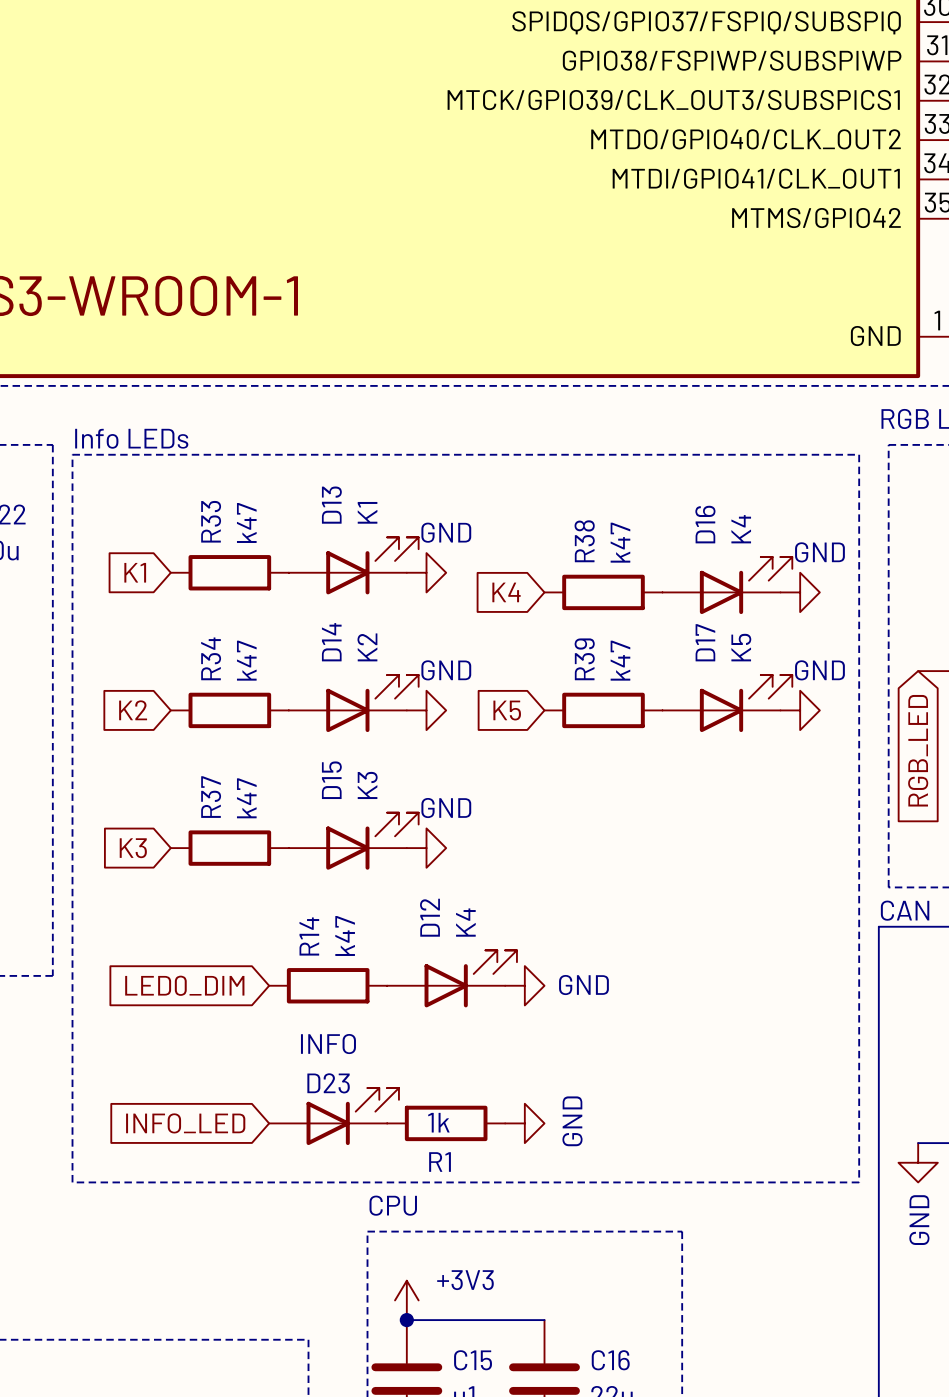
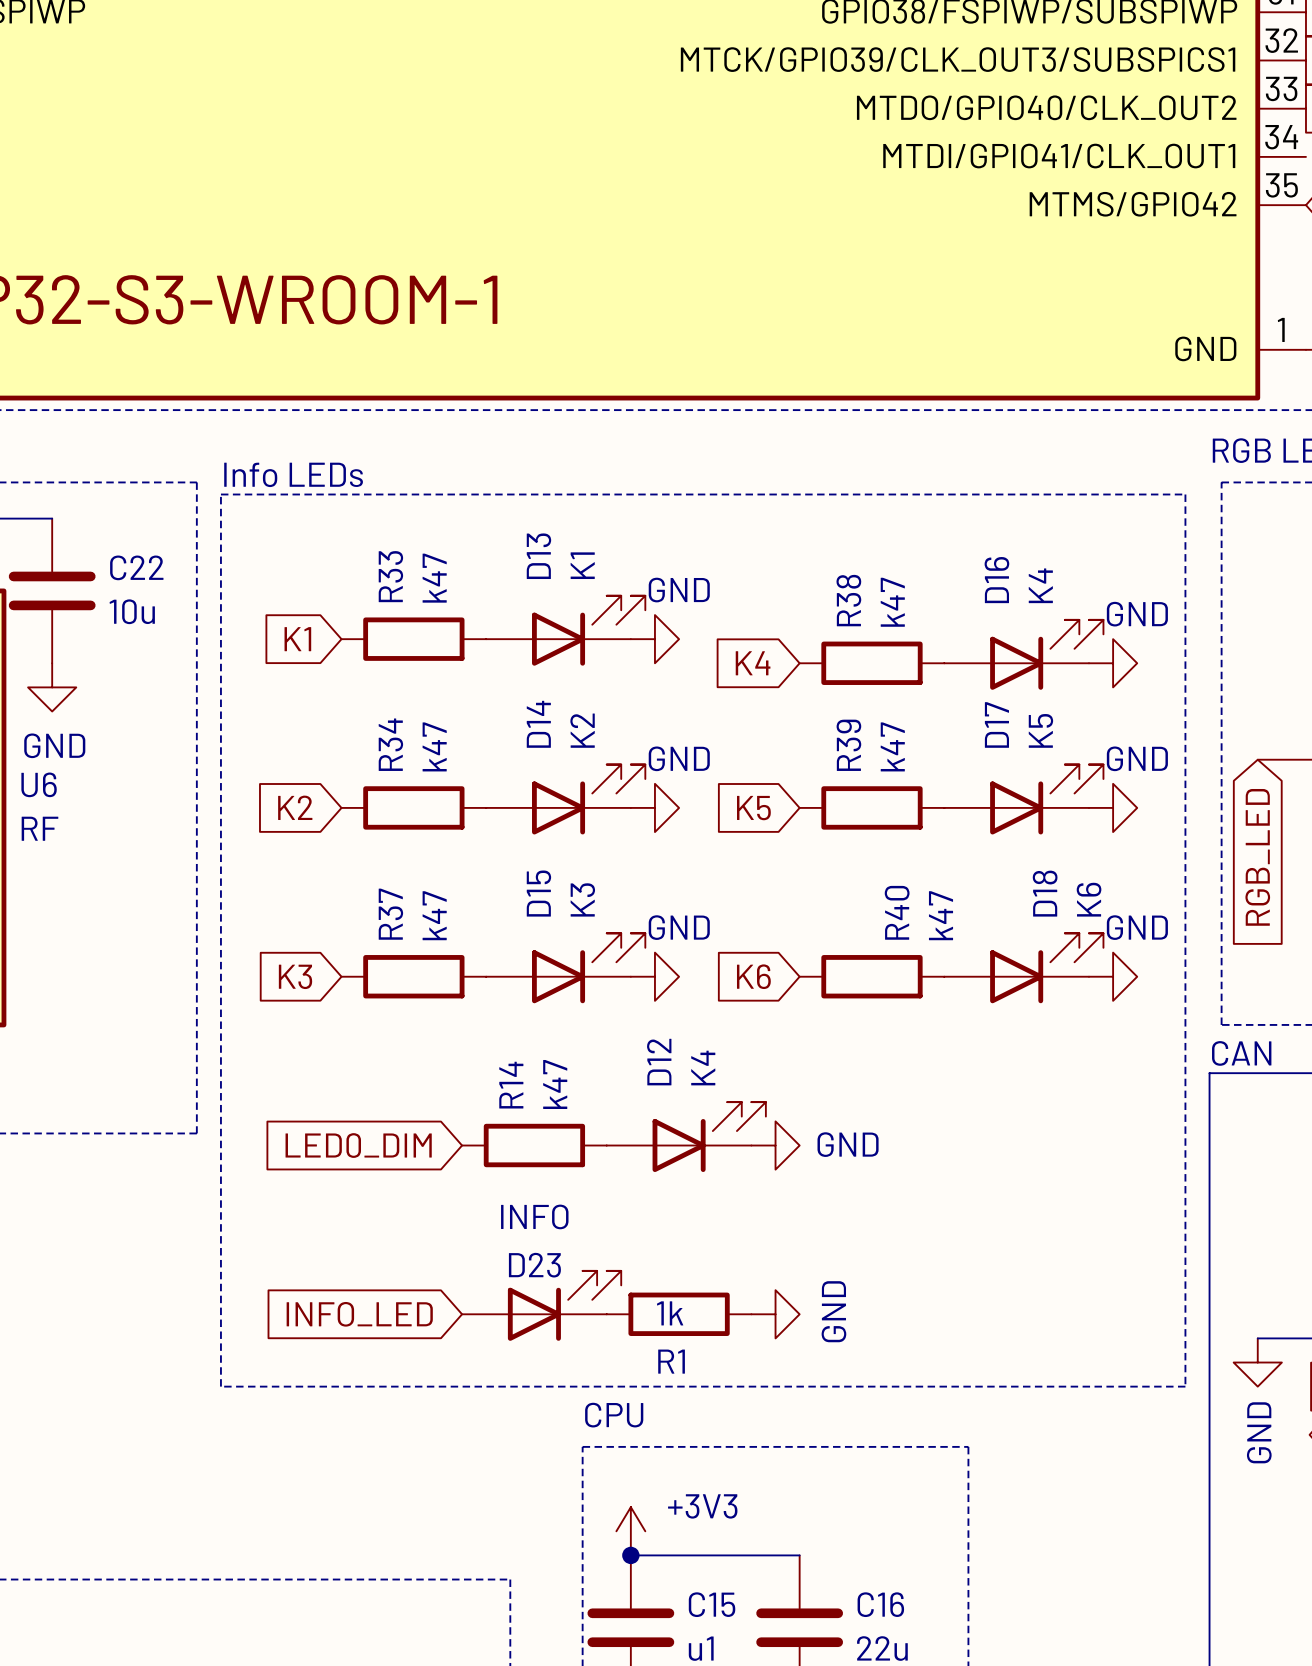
D18: none -> K6 (1023, 968)
global label: none -> K6 (753, 976)
R40: none -> k47 (871, 976)
power symbol: none -> GND (1113, 976)

